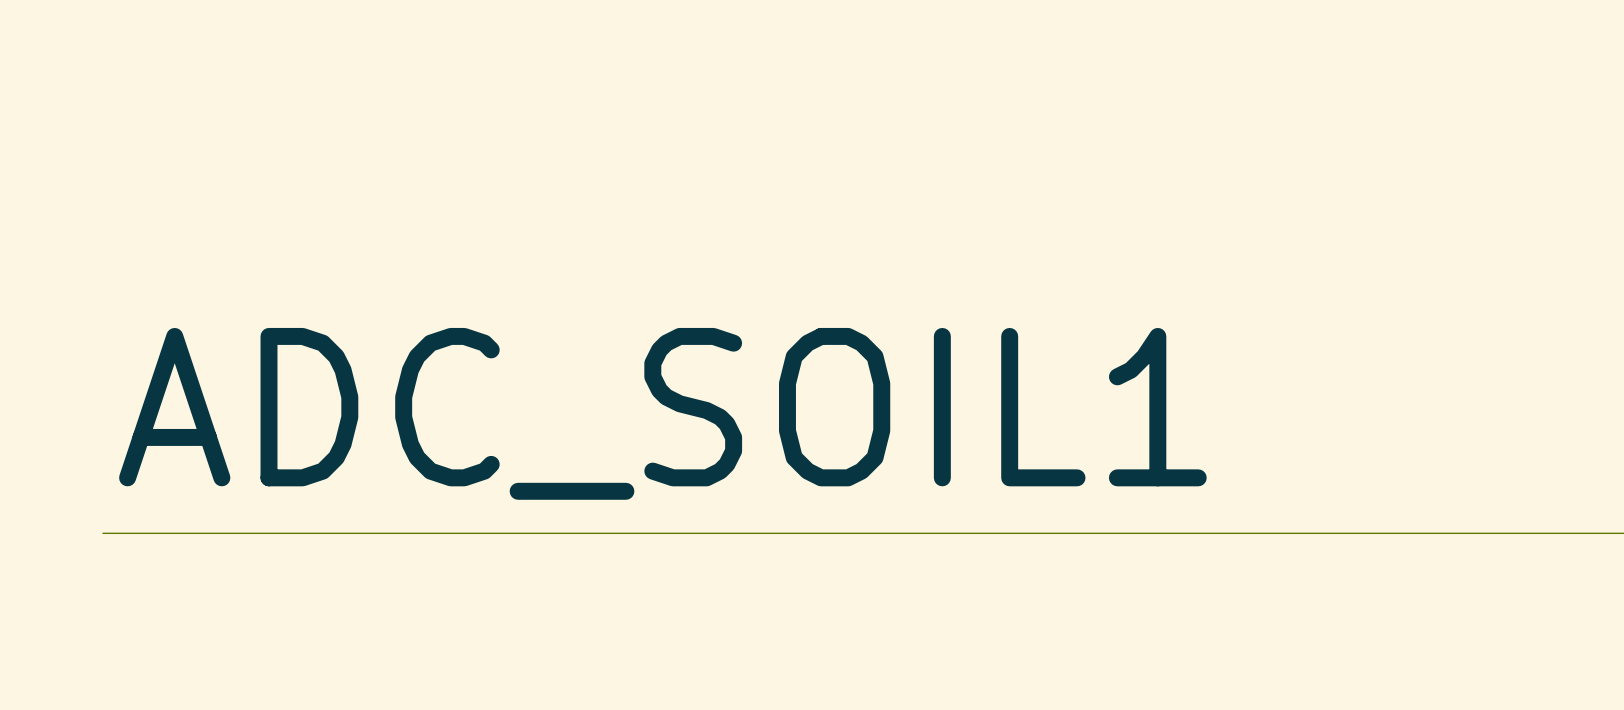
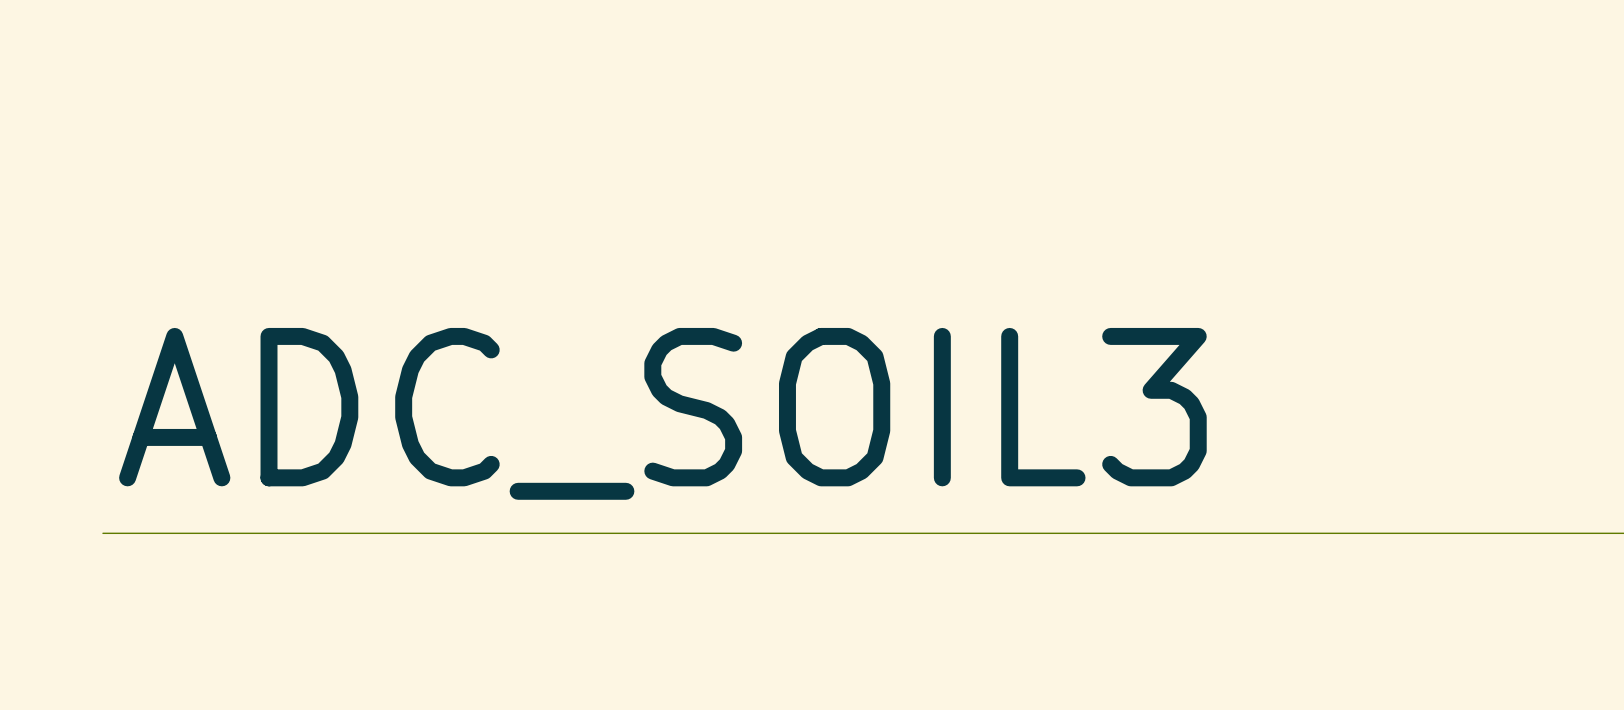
label: ADC_SOIL1 (662, 413) -> ADC_SOIL3 (662, 413)

